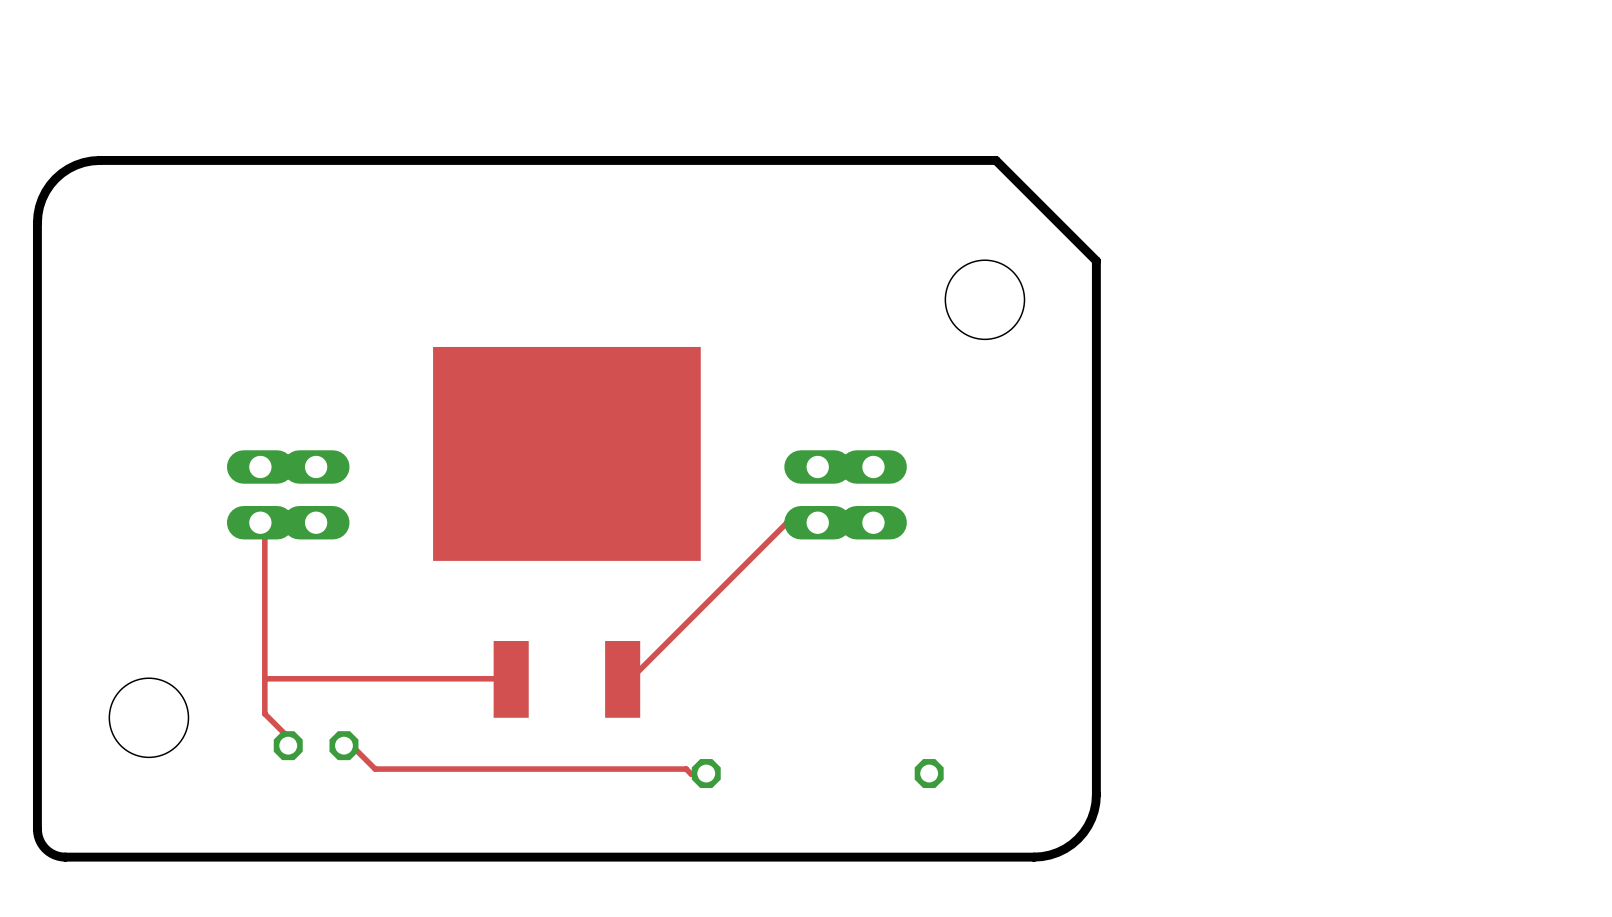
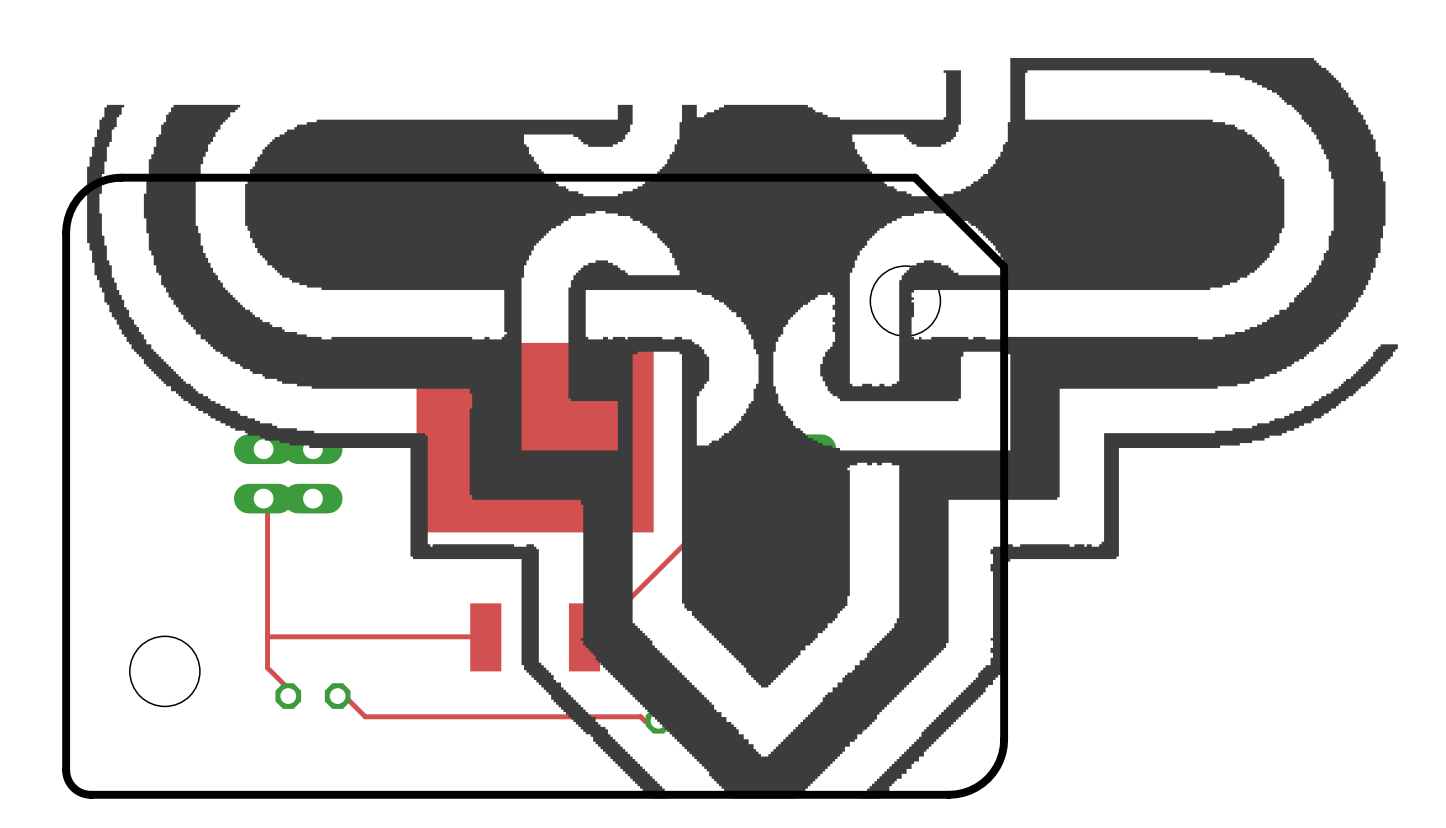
drawing: none -> [143, 57, 1386, 799]
drawing: none -> [87, 104, 670, 799]
drawing: none -> [859, 344, 1398, 799]

